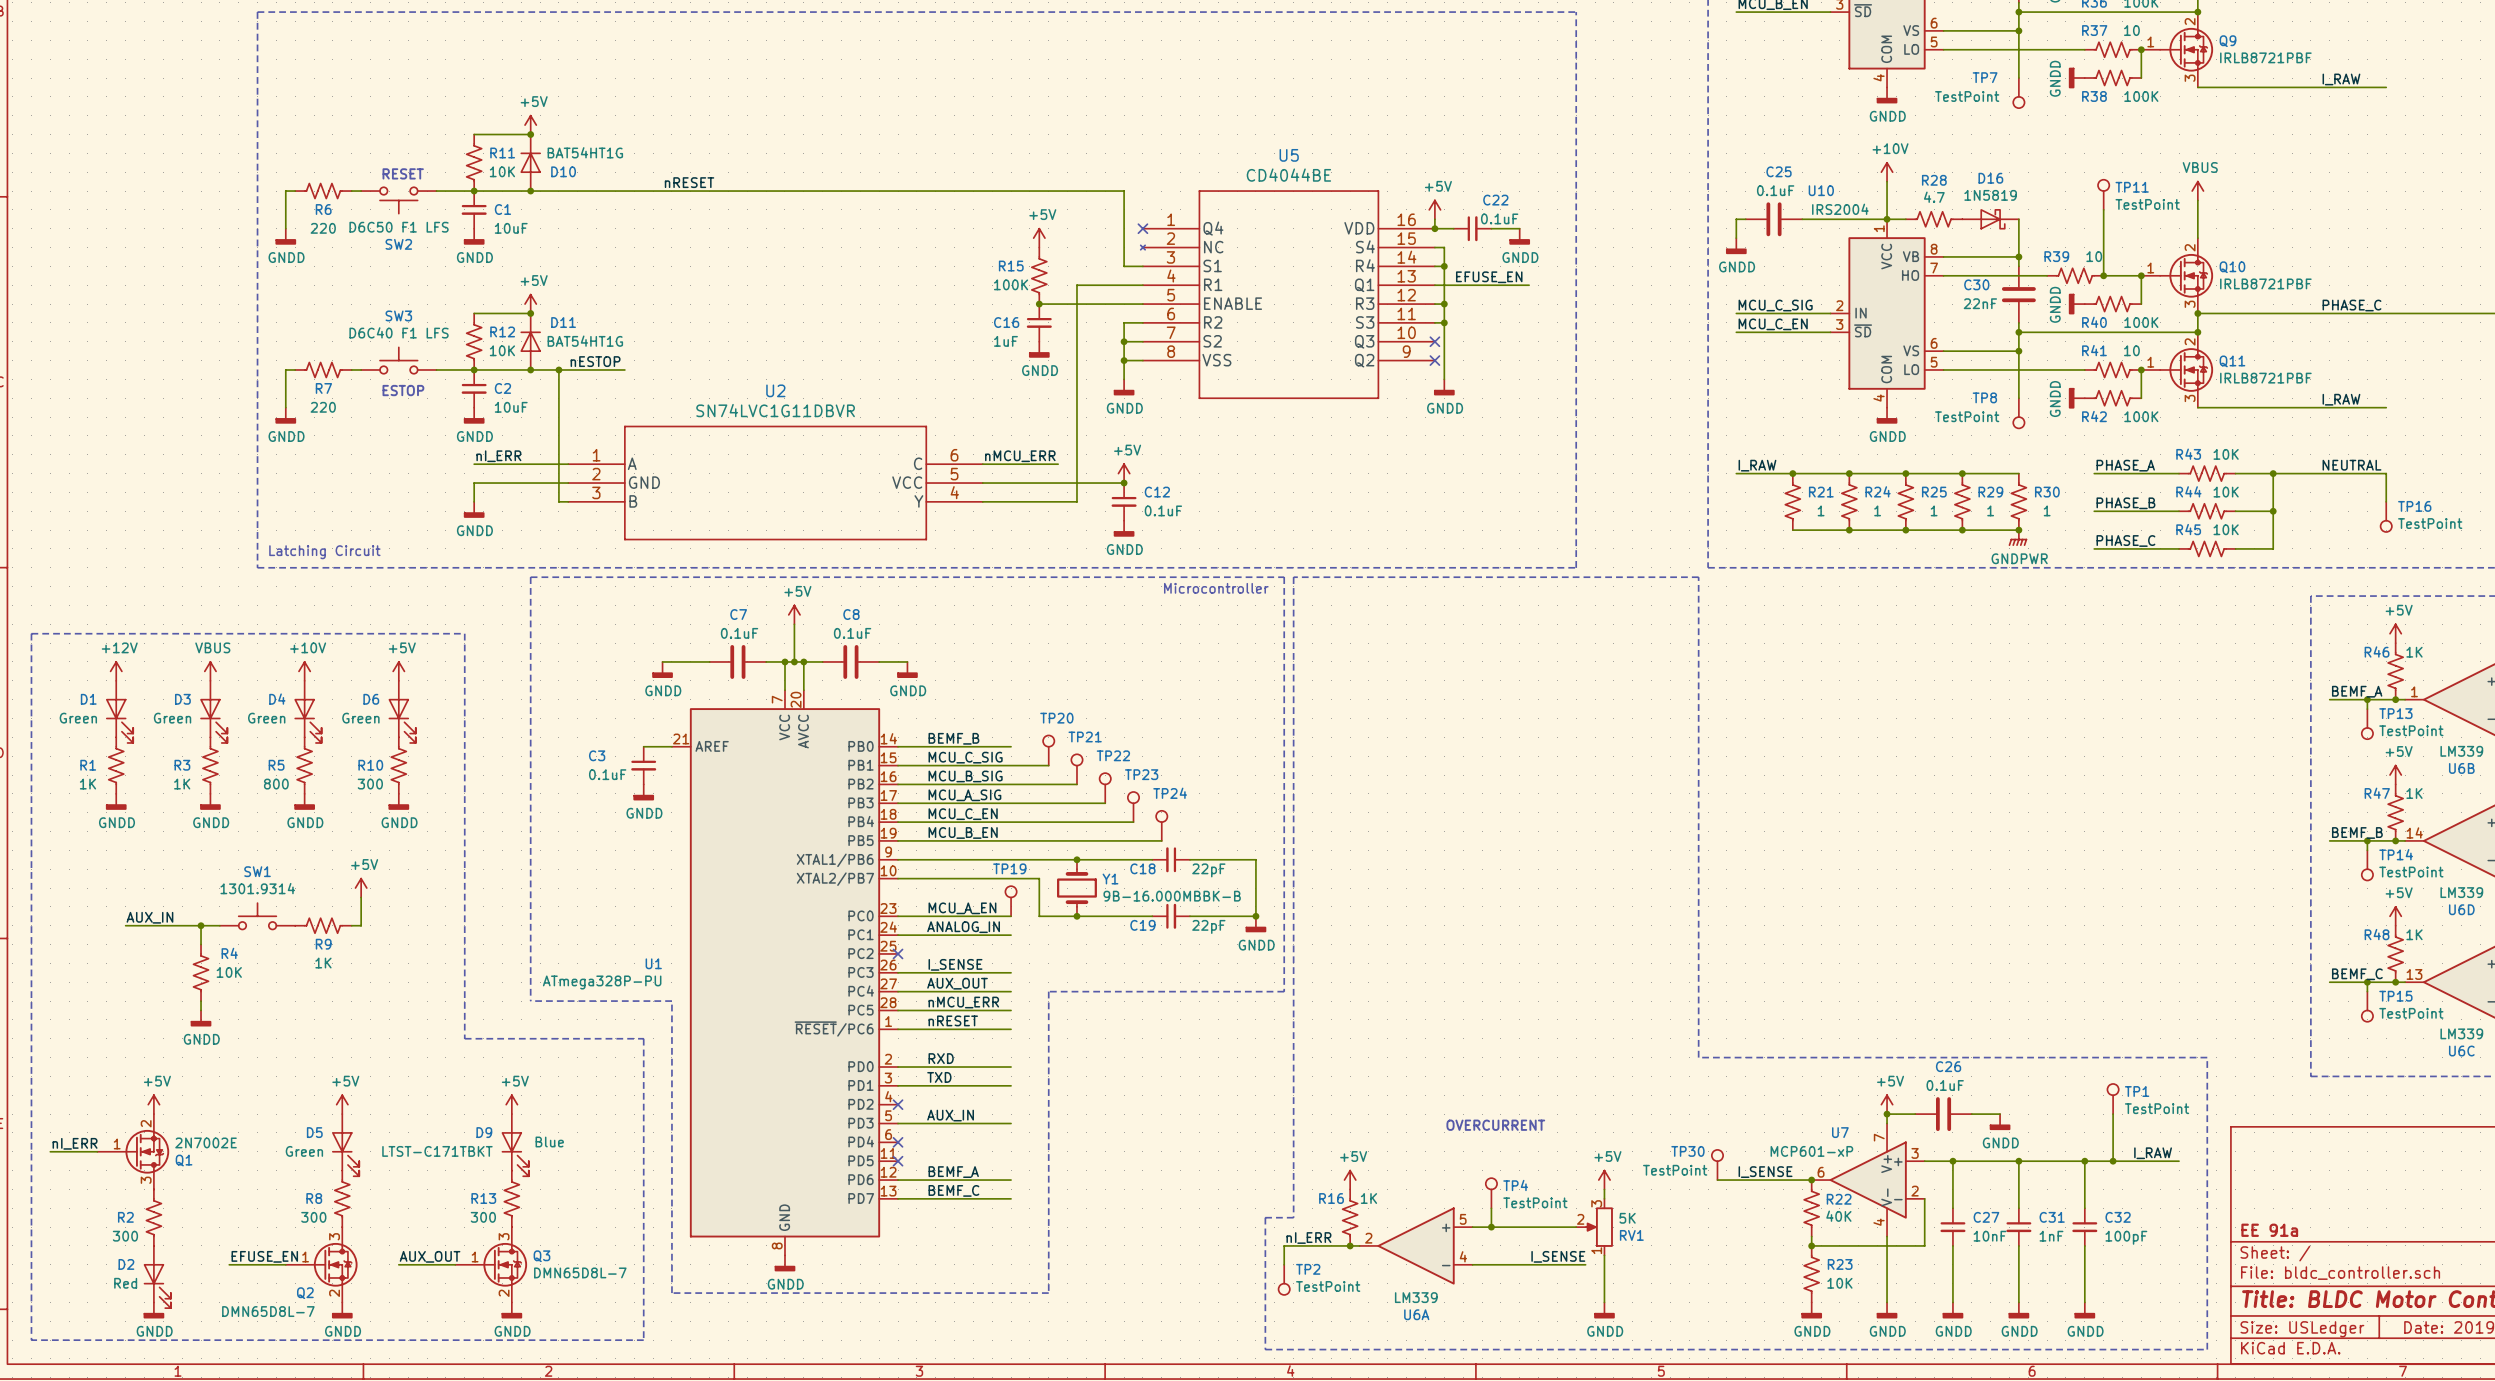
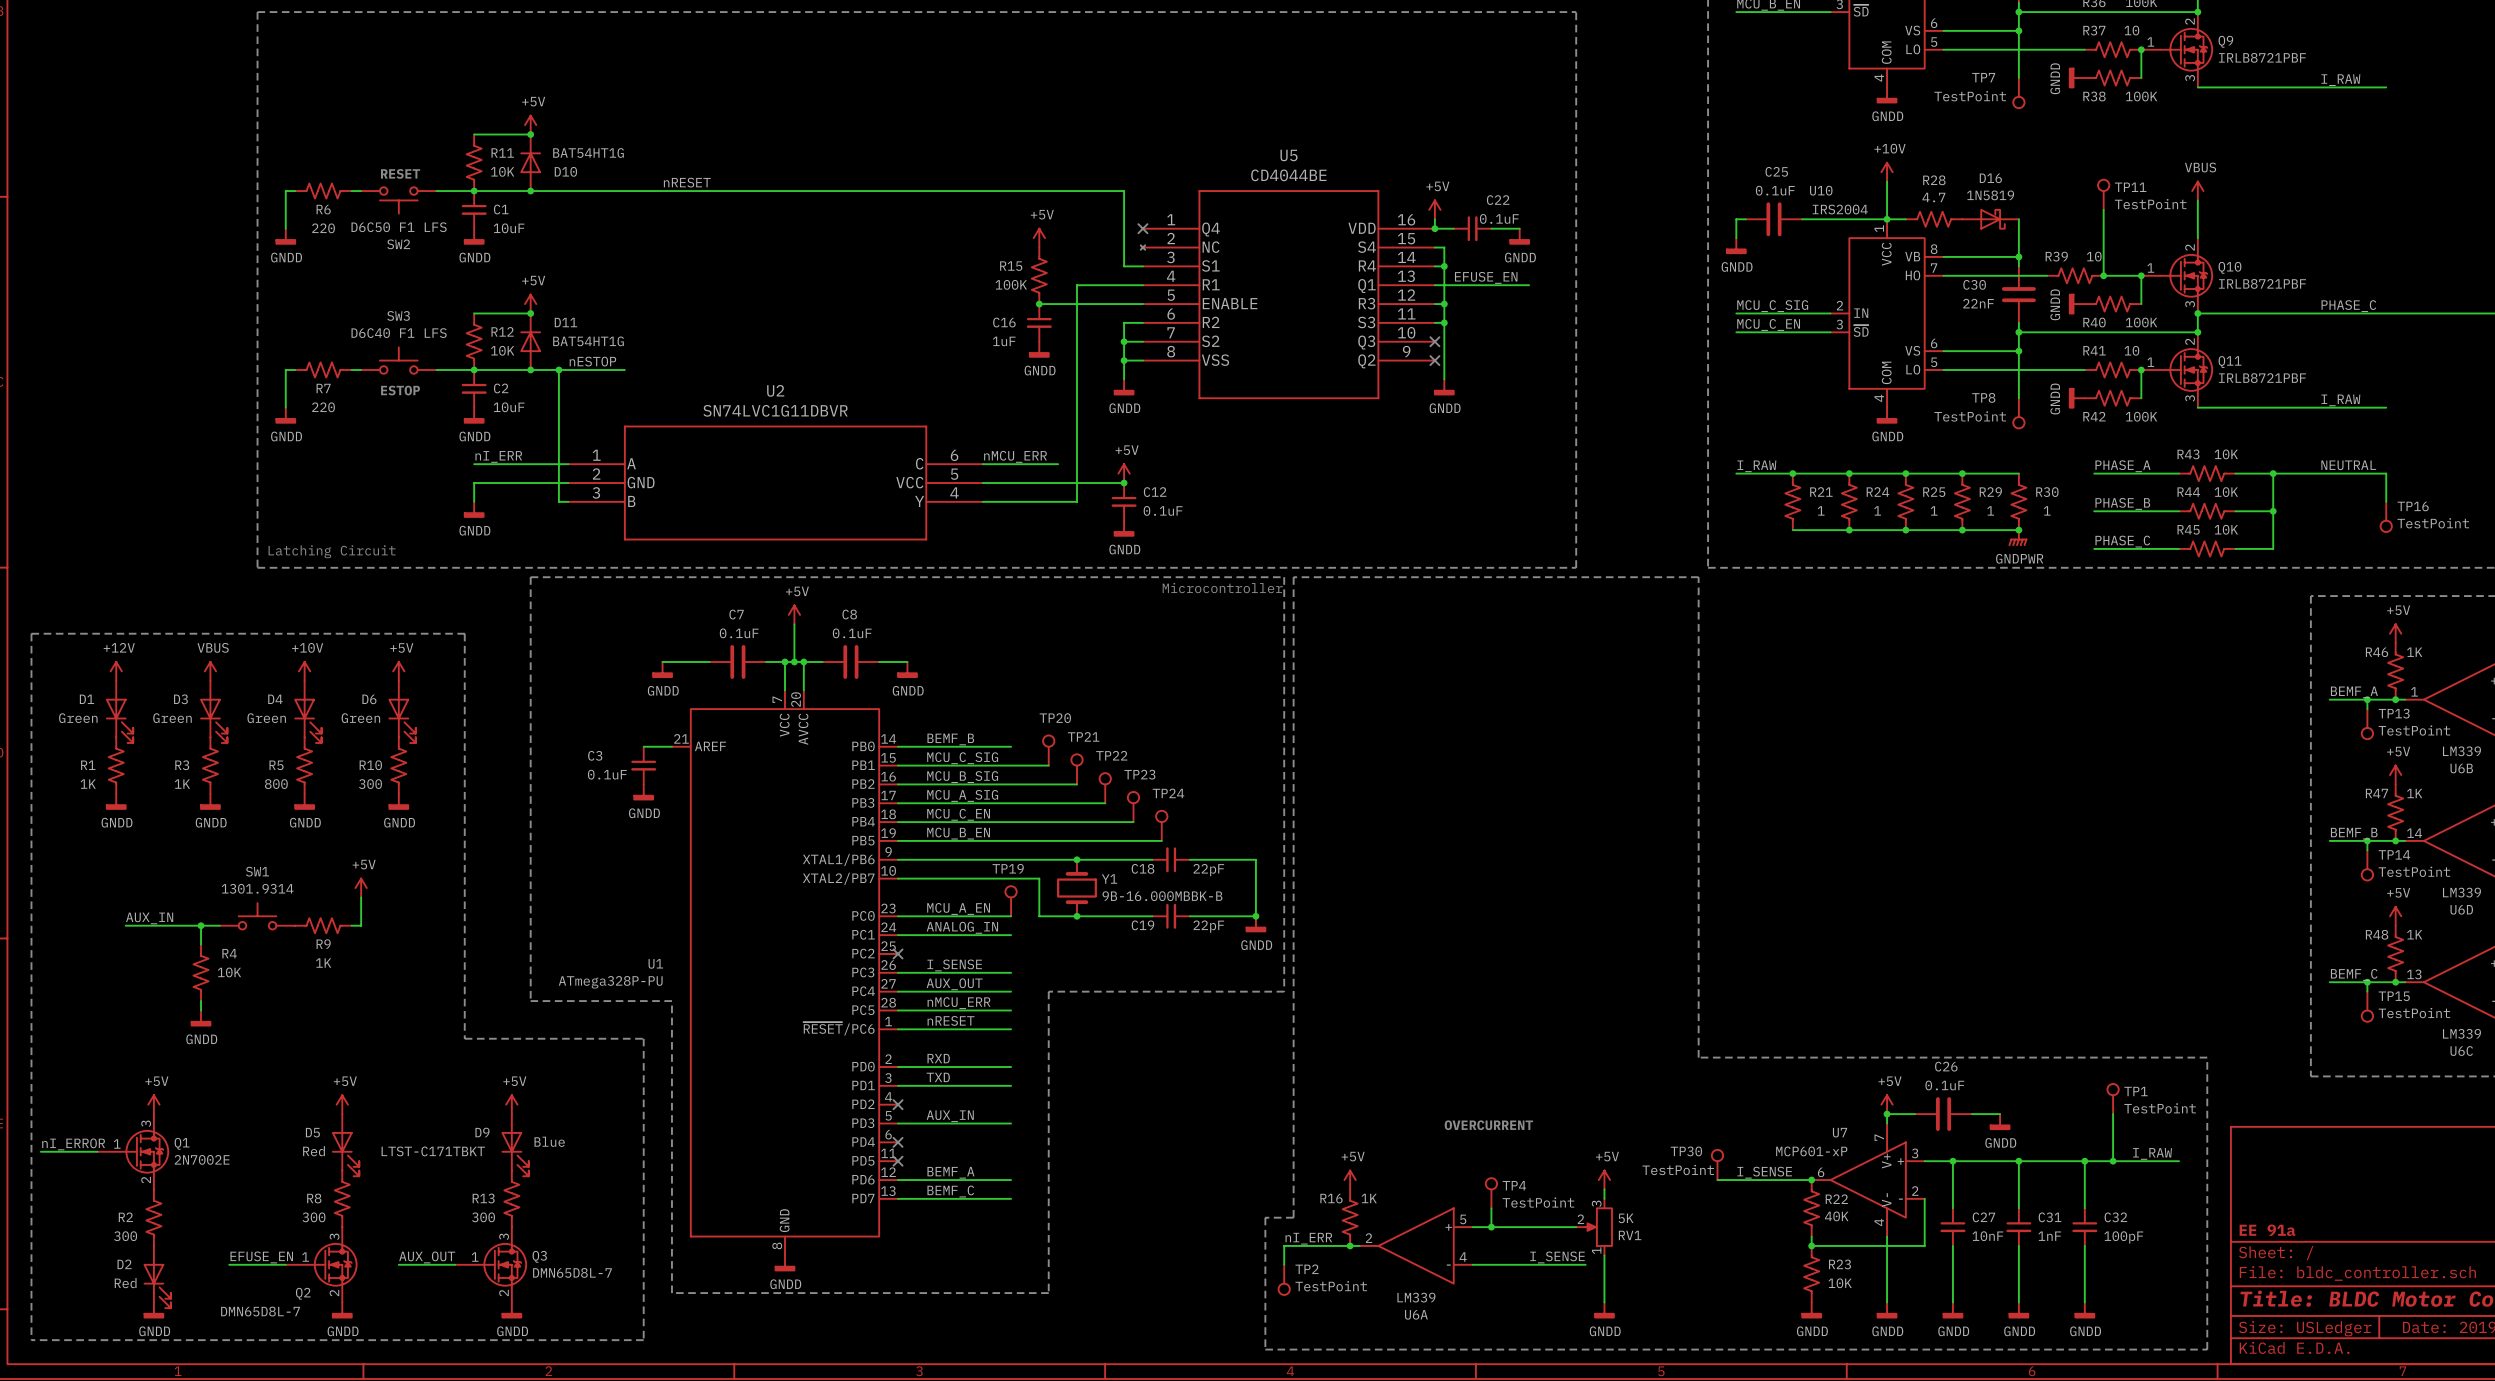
label: nI_ERR (75, 1143) -> nI_ERROR (73, 1144)
wire: none -> (40, 1151) (50, 1151)
Q1 flip: as is (147, 1151) -> up-down (147, 1151)
D5 text: Green (304, 1151) -> Red (314, 1151)

